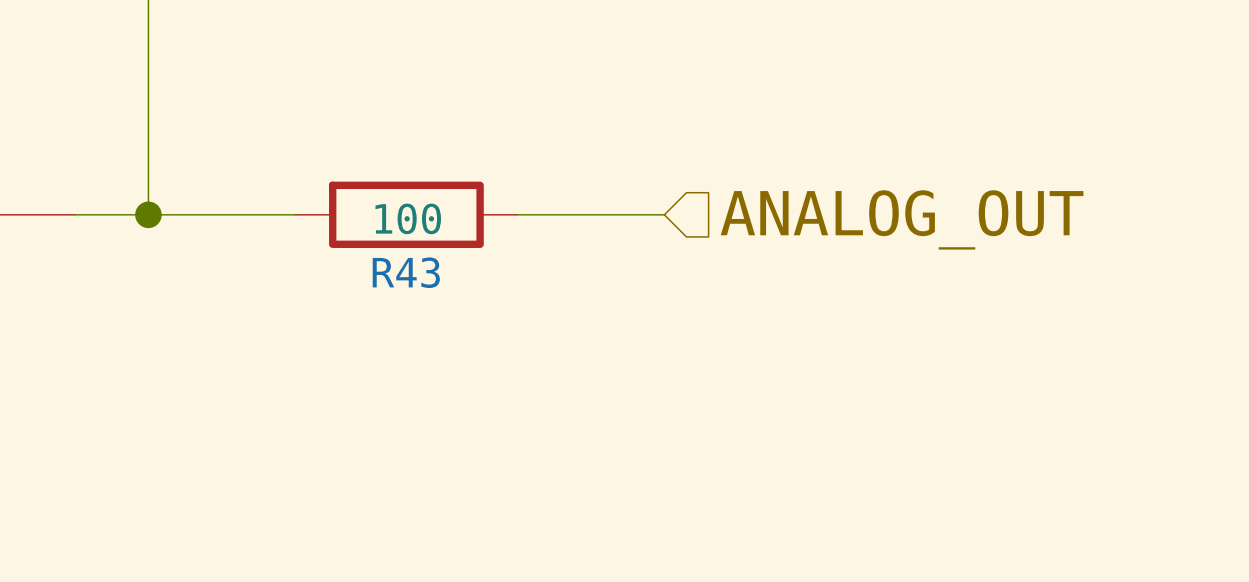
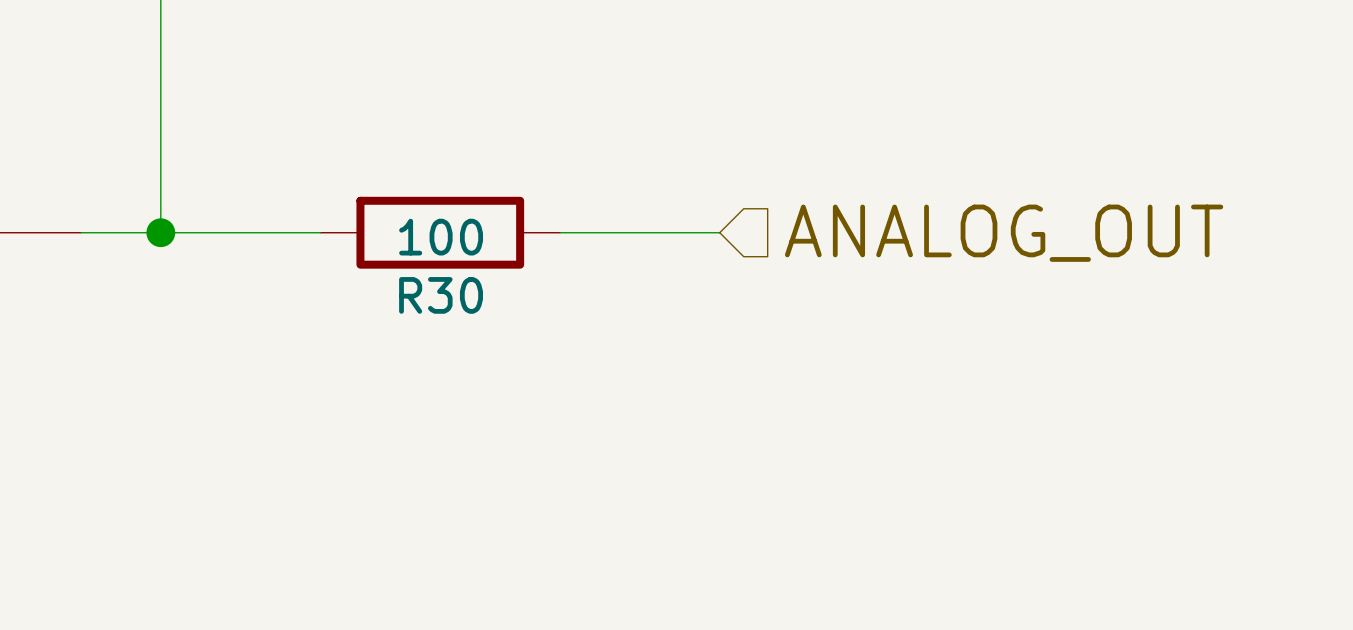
R43 name: R43 (406, 272) -> R30 (441, 295)

